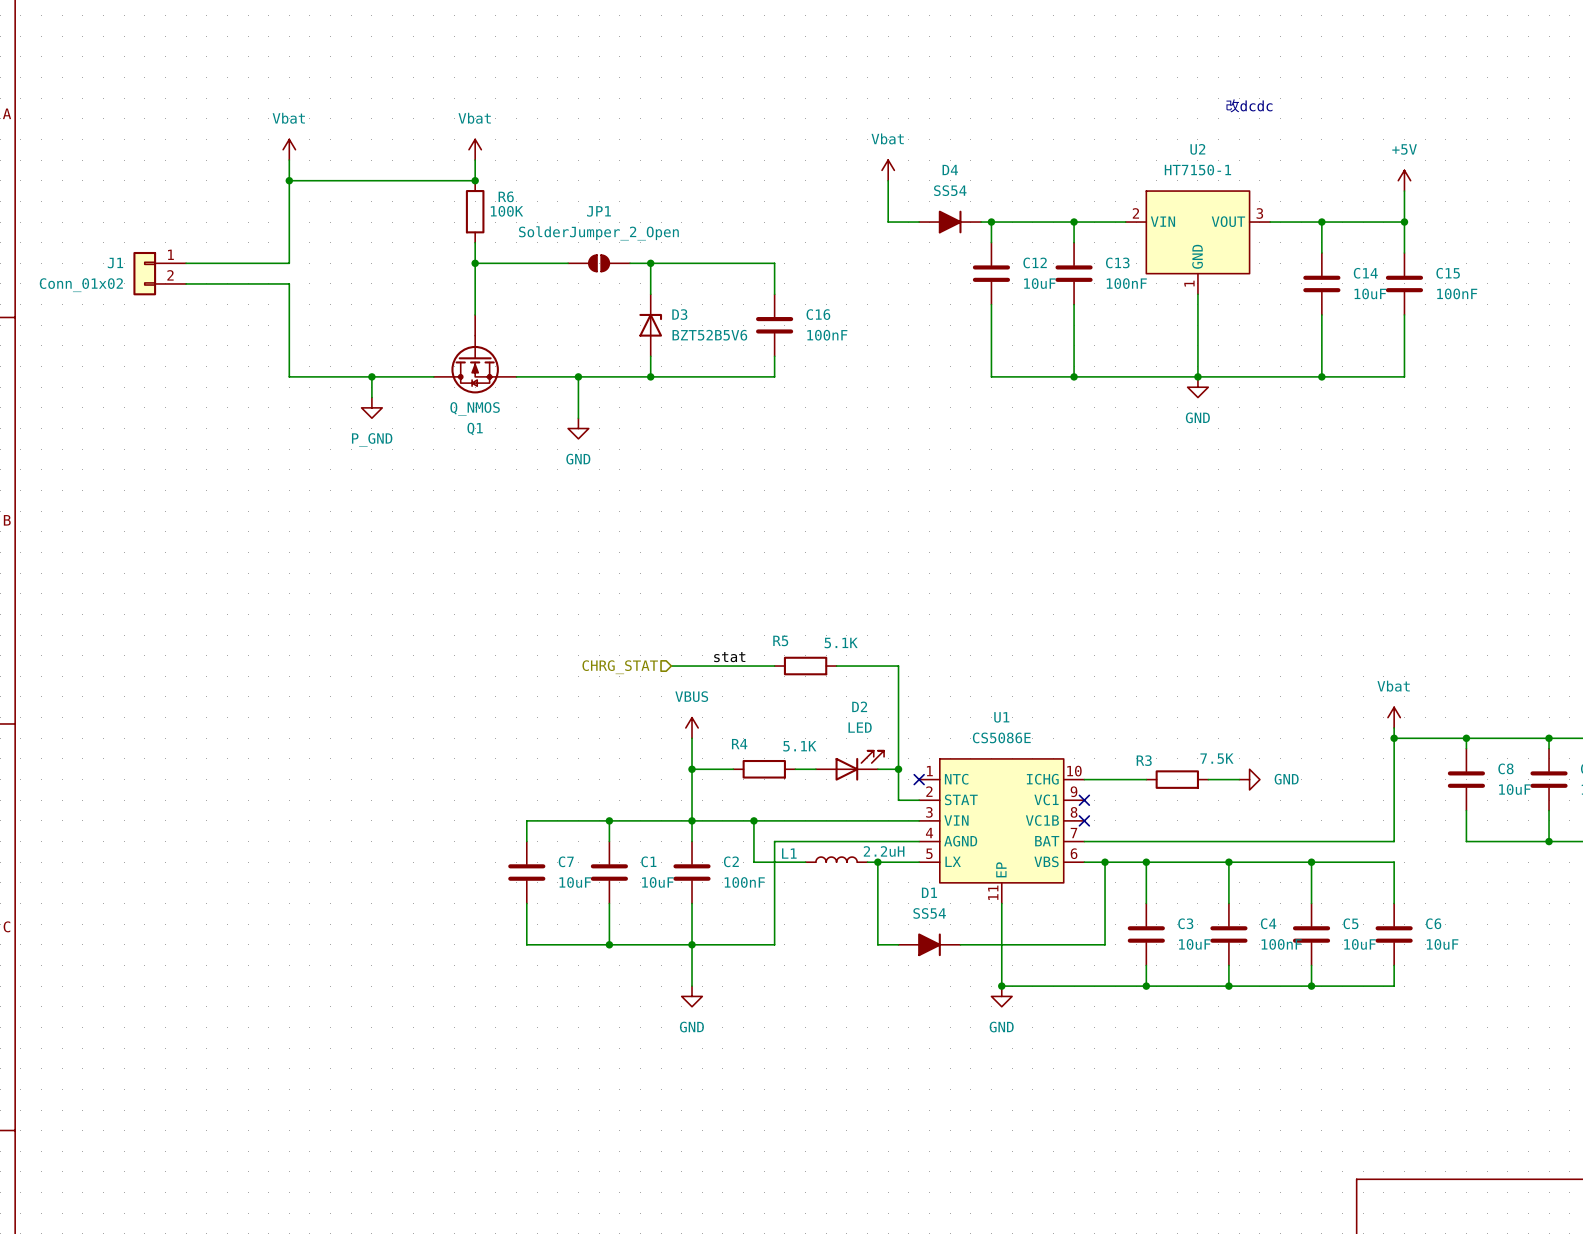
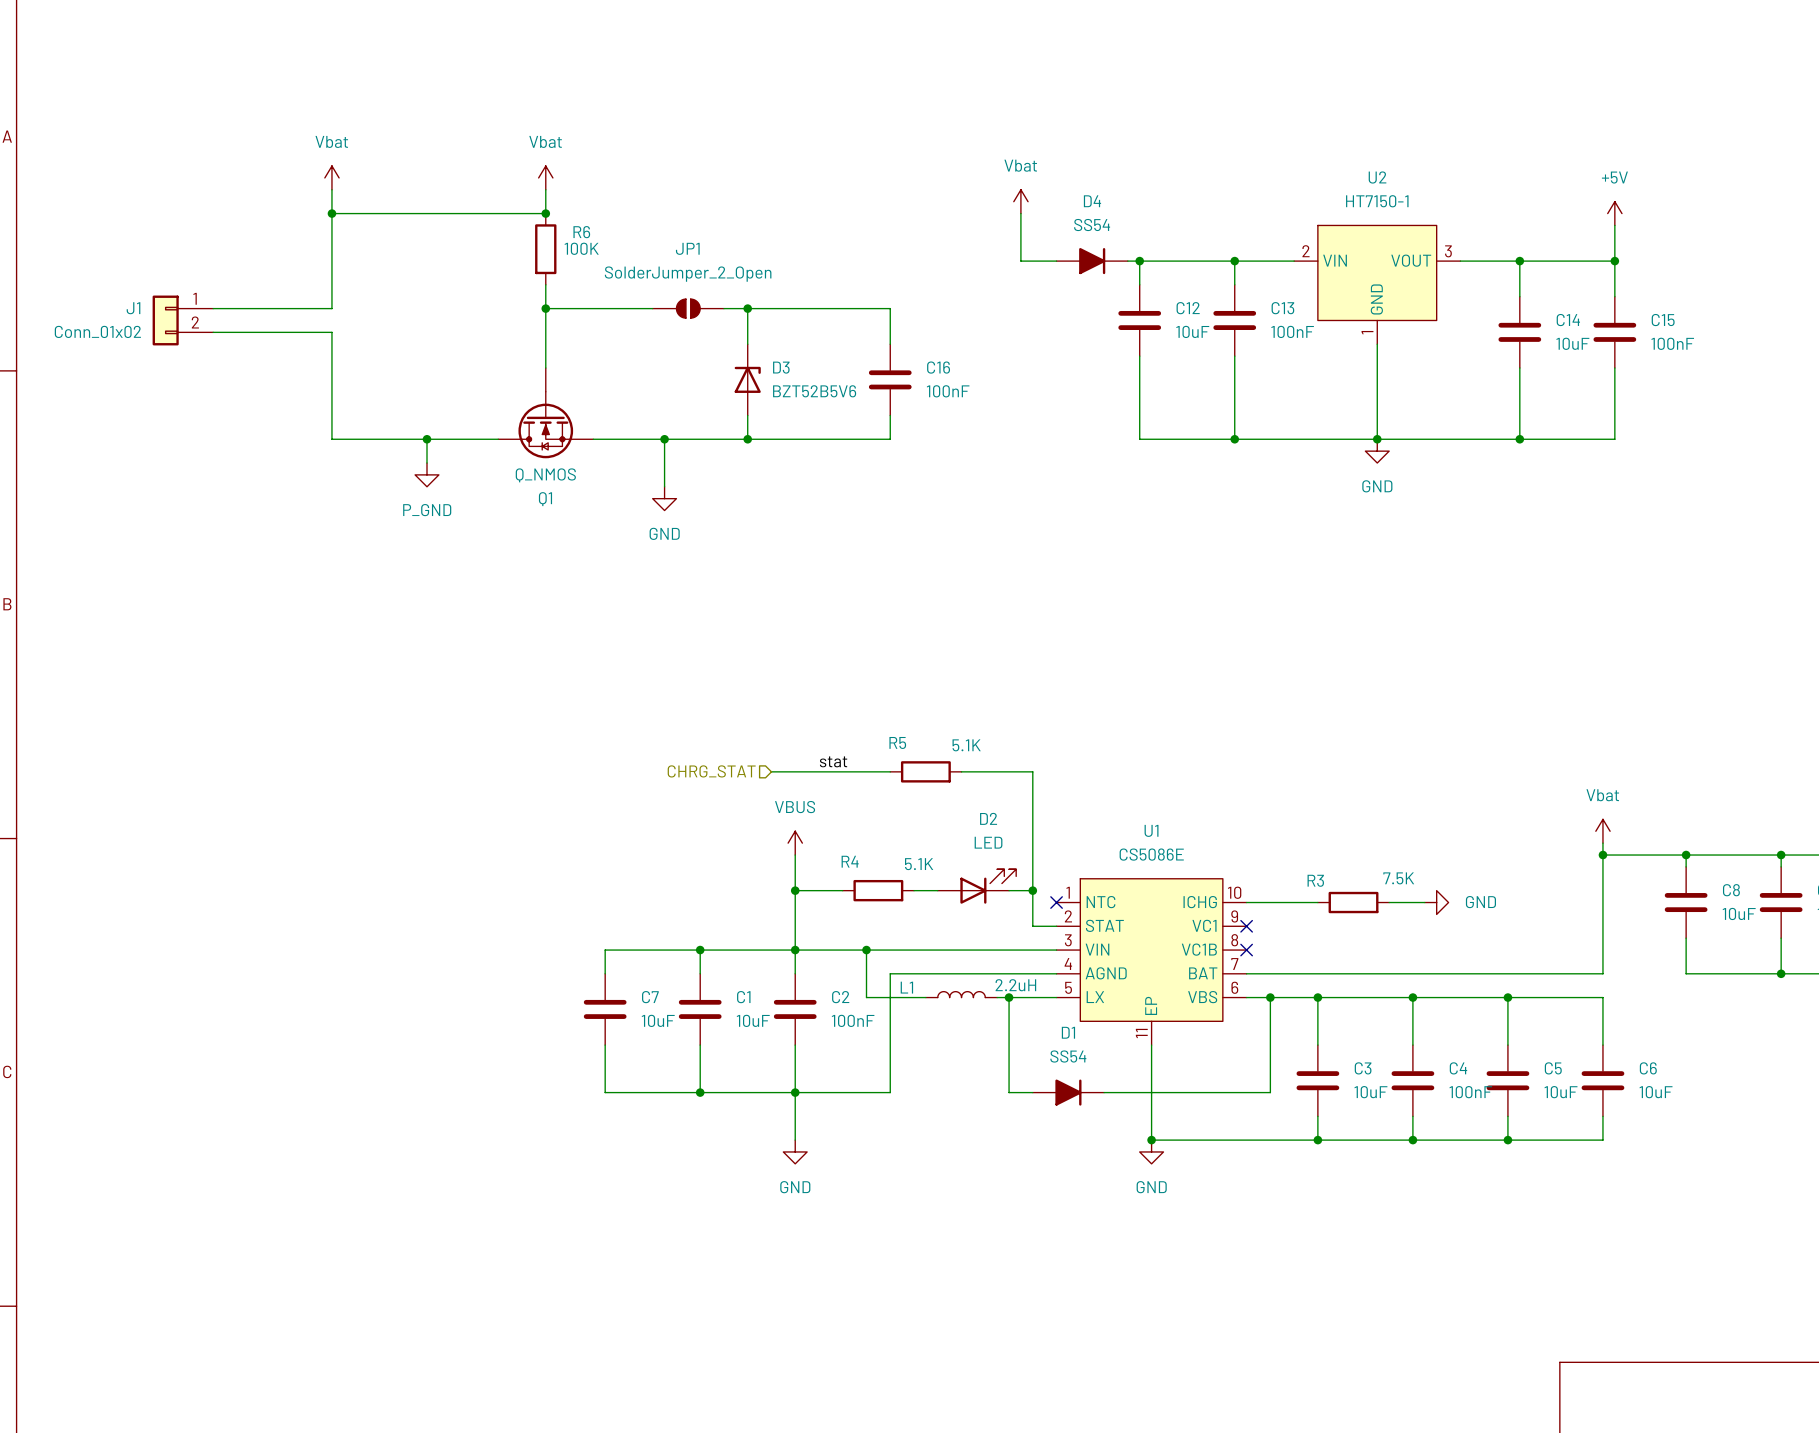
text: 改dcdc (1249, 105) -> none

